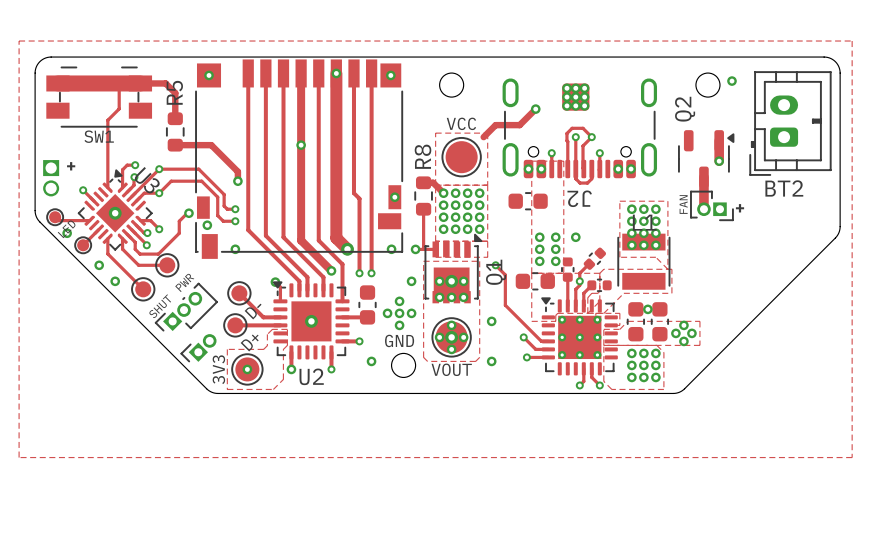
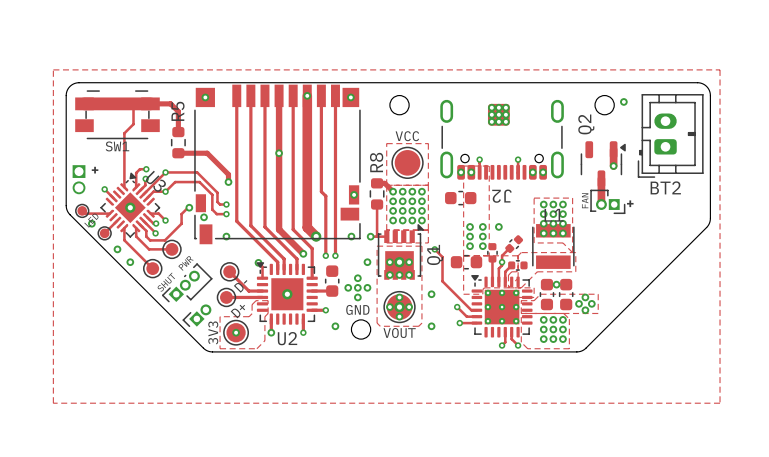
track: (535, 109) (519, 125) (495, 125) (483, 137) -> none
via: (535, 109) -> none
track: (575, 137) (575, 178) (580, 183) (587, 183) (591, 178) (591, 169) -> none
via: (575, 137) -> none
via: (591, 137) -> none
track: (567, 169) (566, 133) (572, 128) (582, 128) (591, 137) (583, 145) (583, 169) -> none

